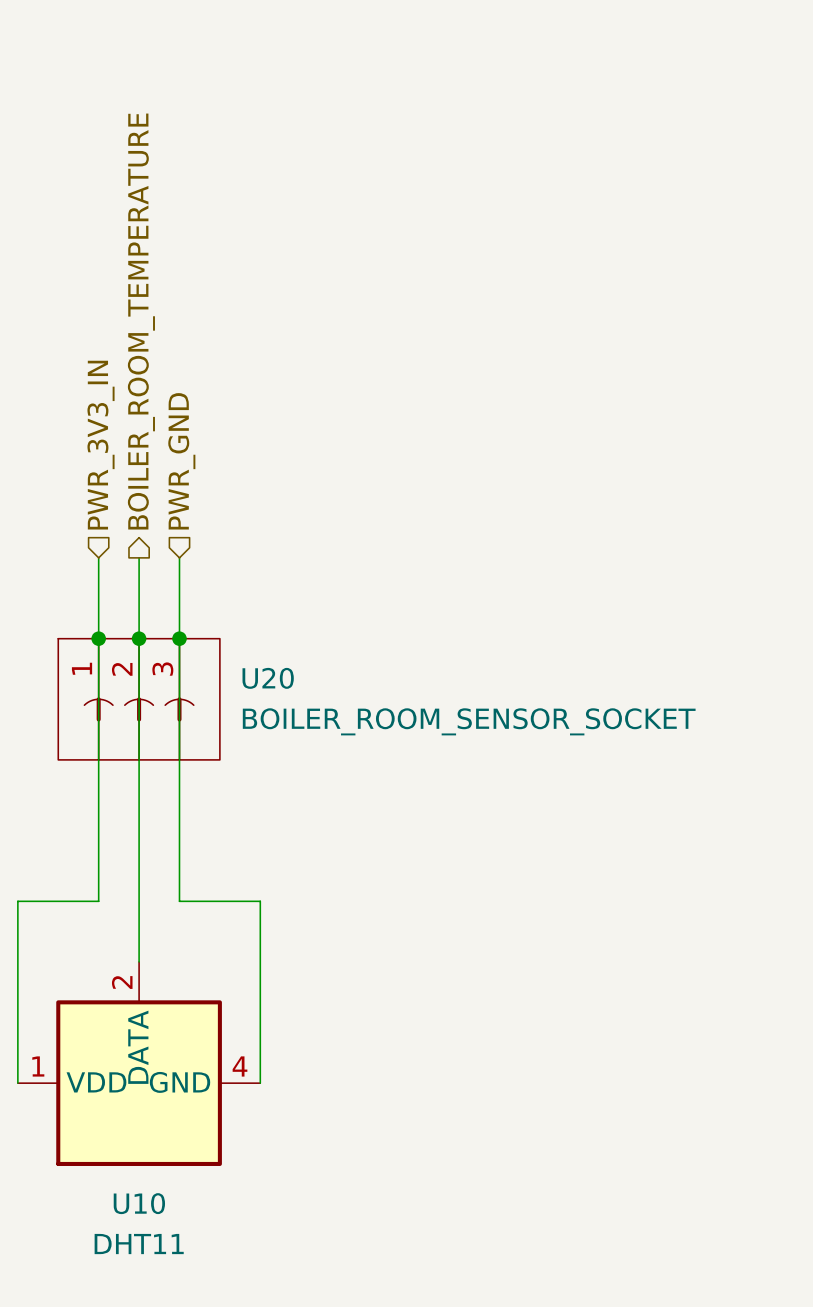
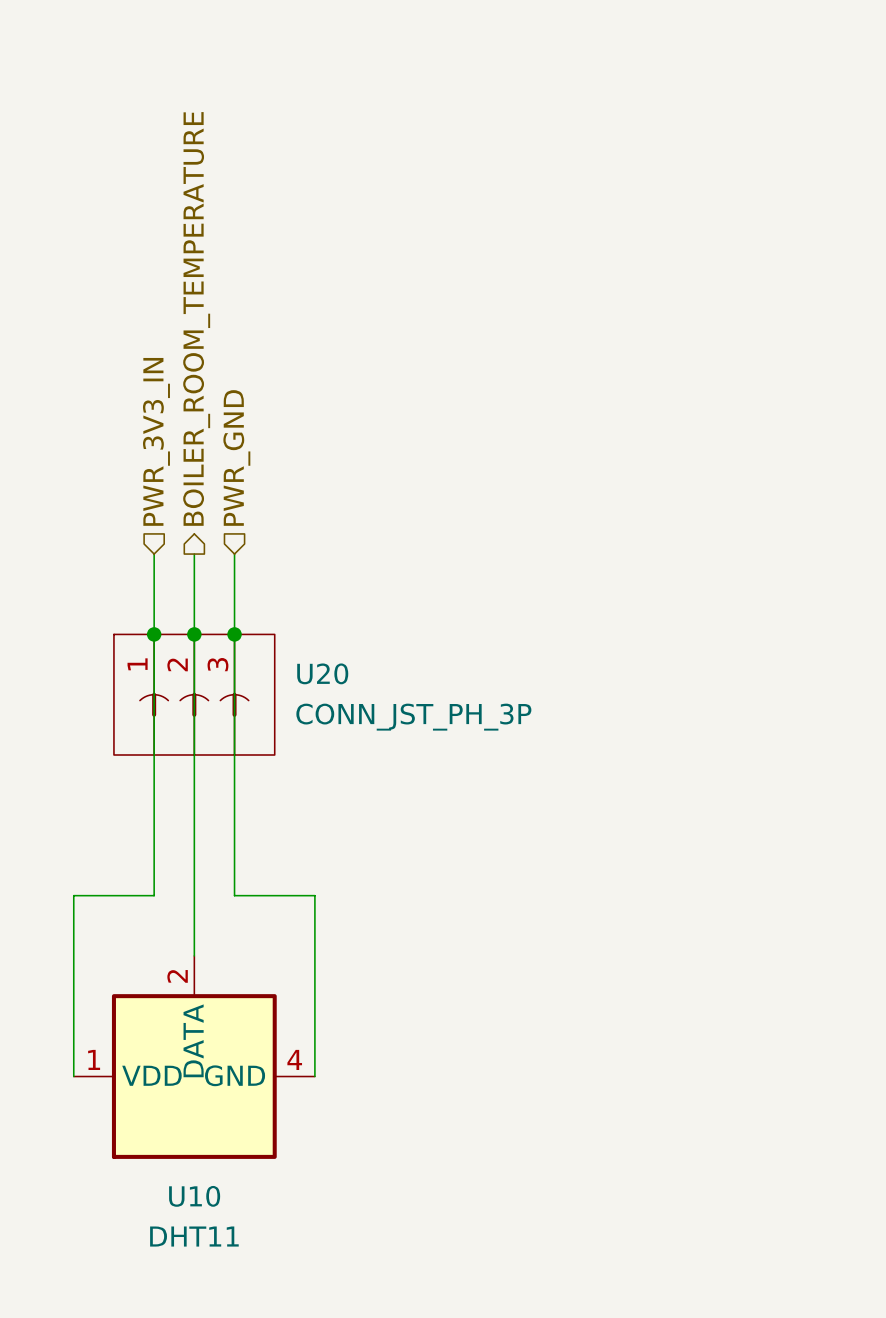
U20 value: BOILER_ROOM_SENSOR_SOCKET (469, 721) -> CONN_JST_PH_3P (413, 717)

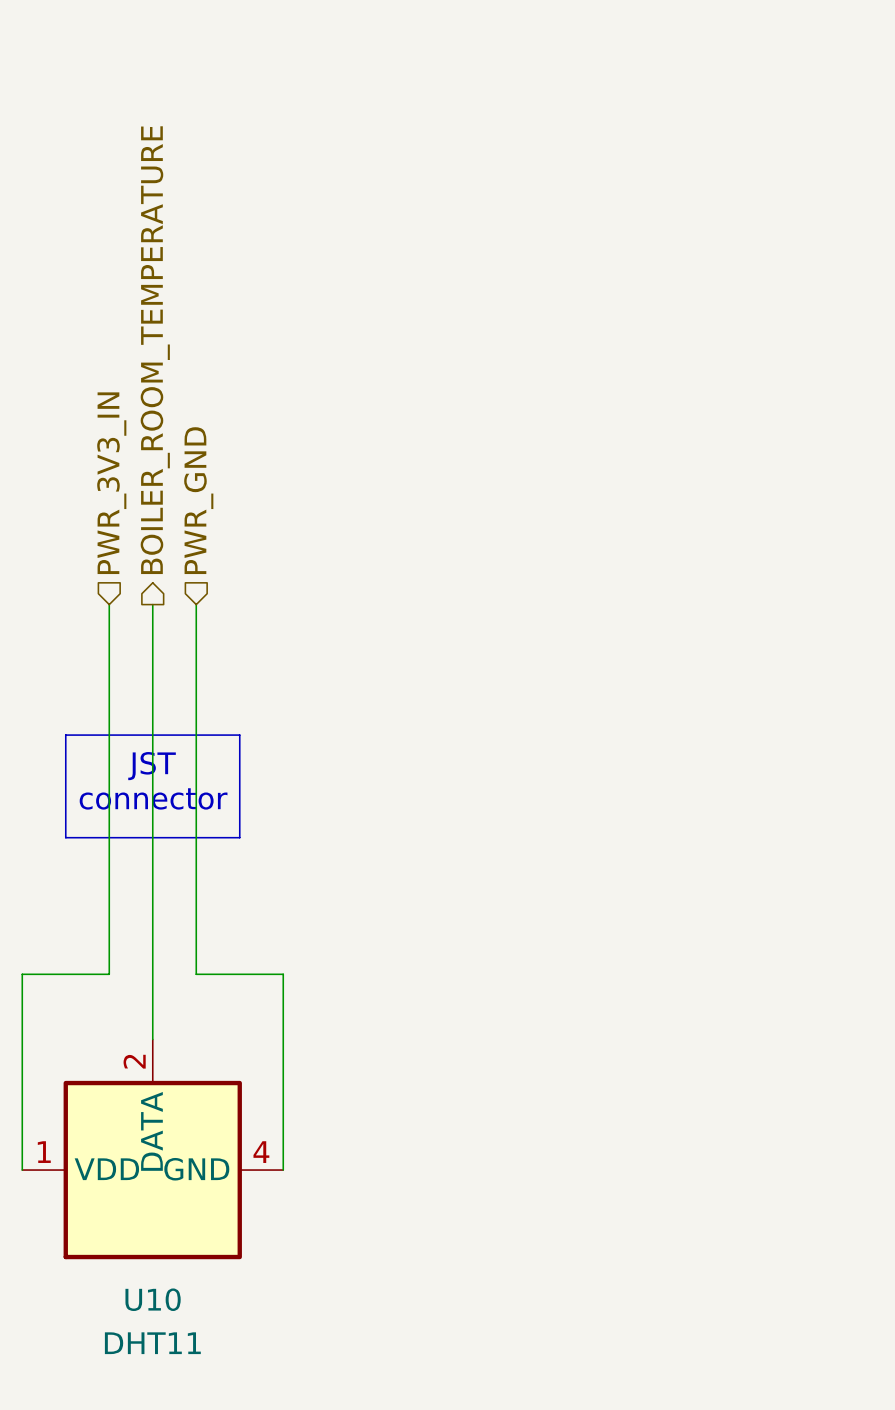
junction: (154, 634) -> none
junction: (194, 634) -> none
junction: (234, 634) -> none
line: none -> (65, 735) (239, 735) (239, 837) (65, 837) (65, 735)
U20: CONN_JST_PH_3P (194, 694) -> none
text: none -> JST (152, 766)
text: none -> connector (153, 798)

